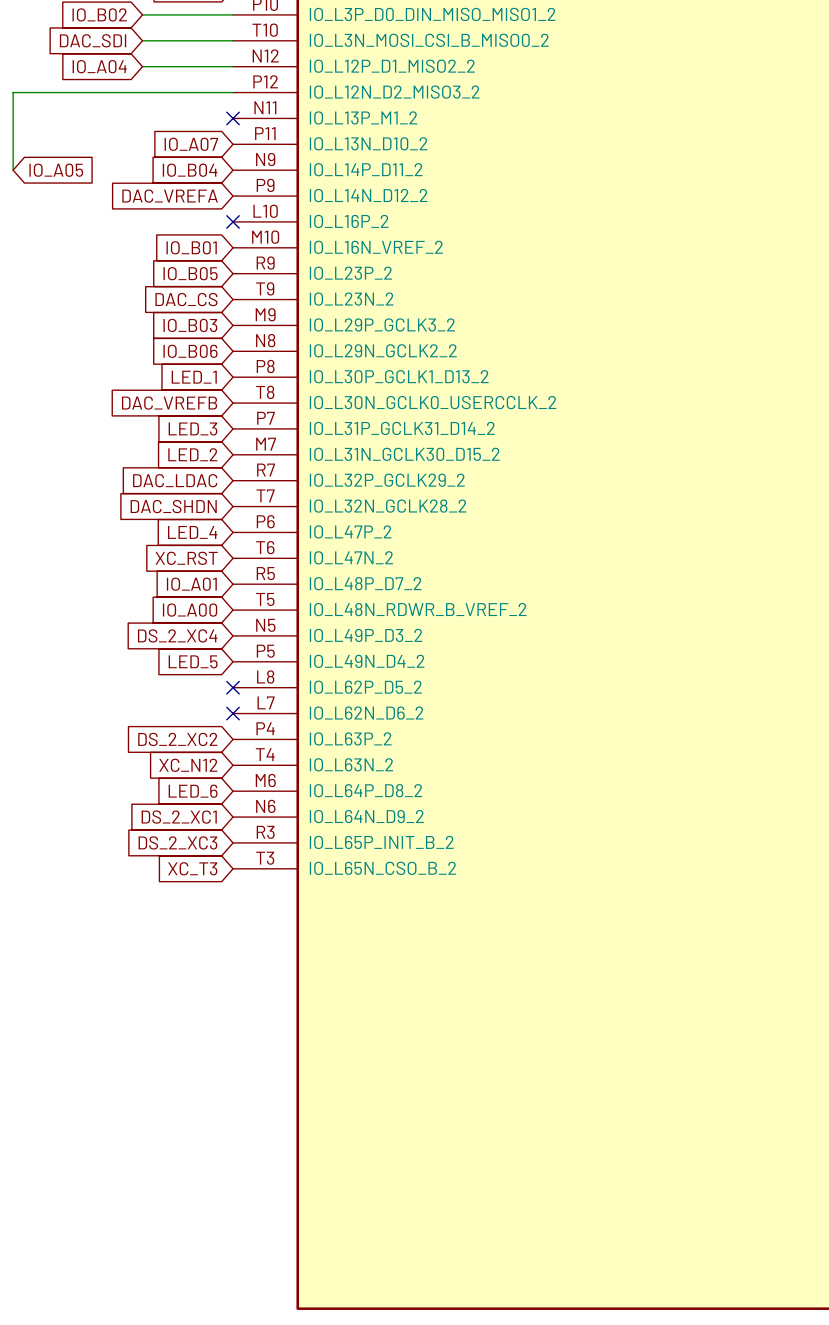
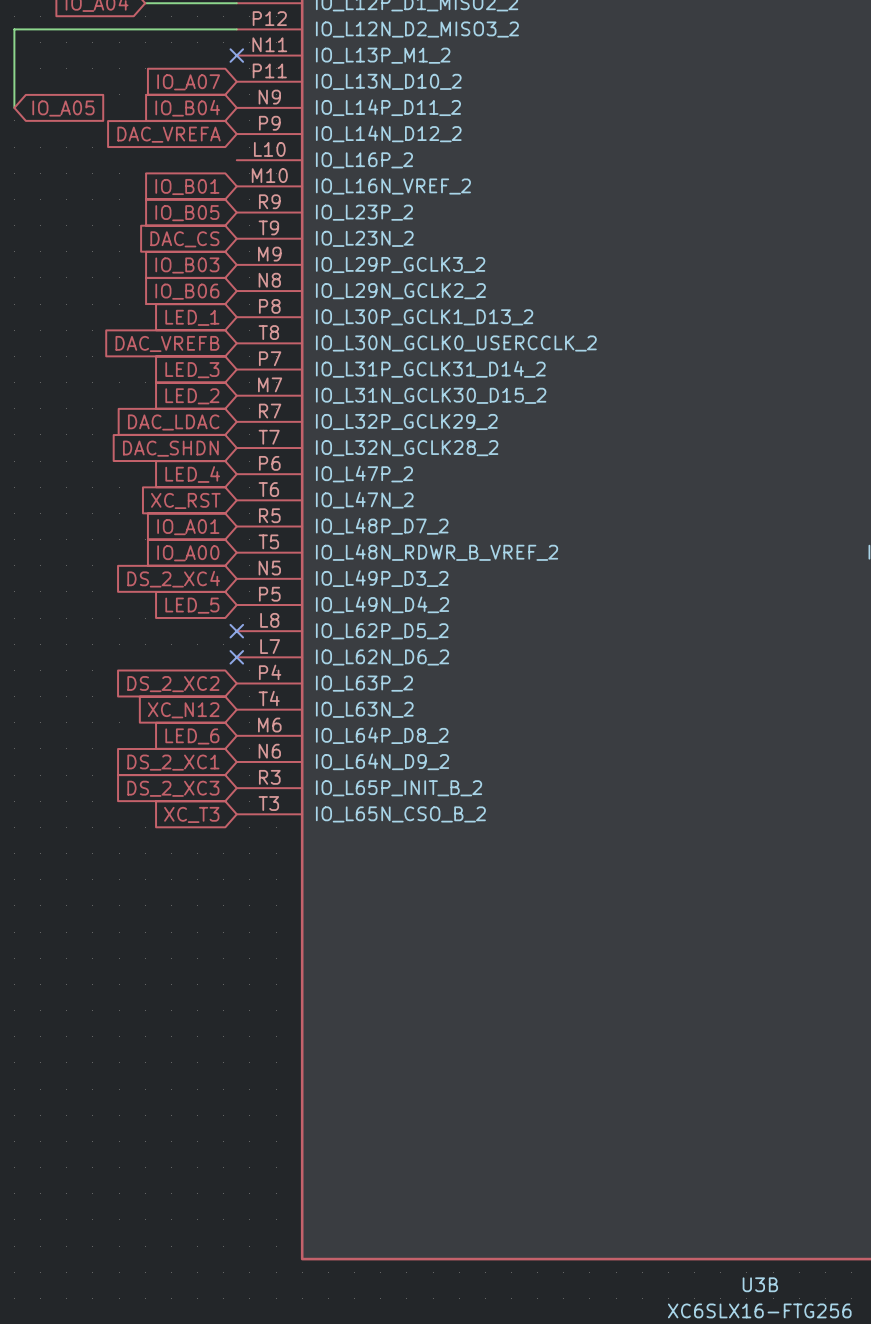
no-connect mark: (233, 221) -> none

